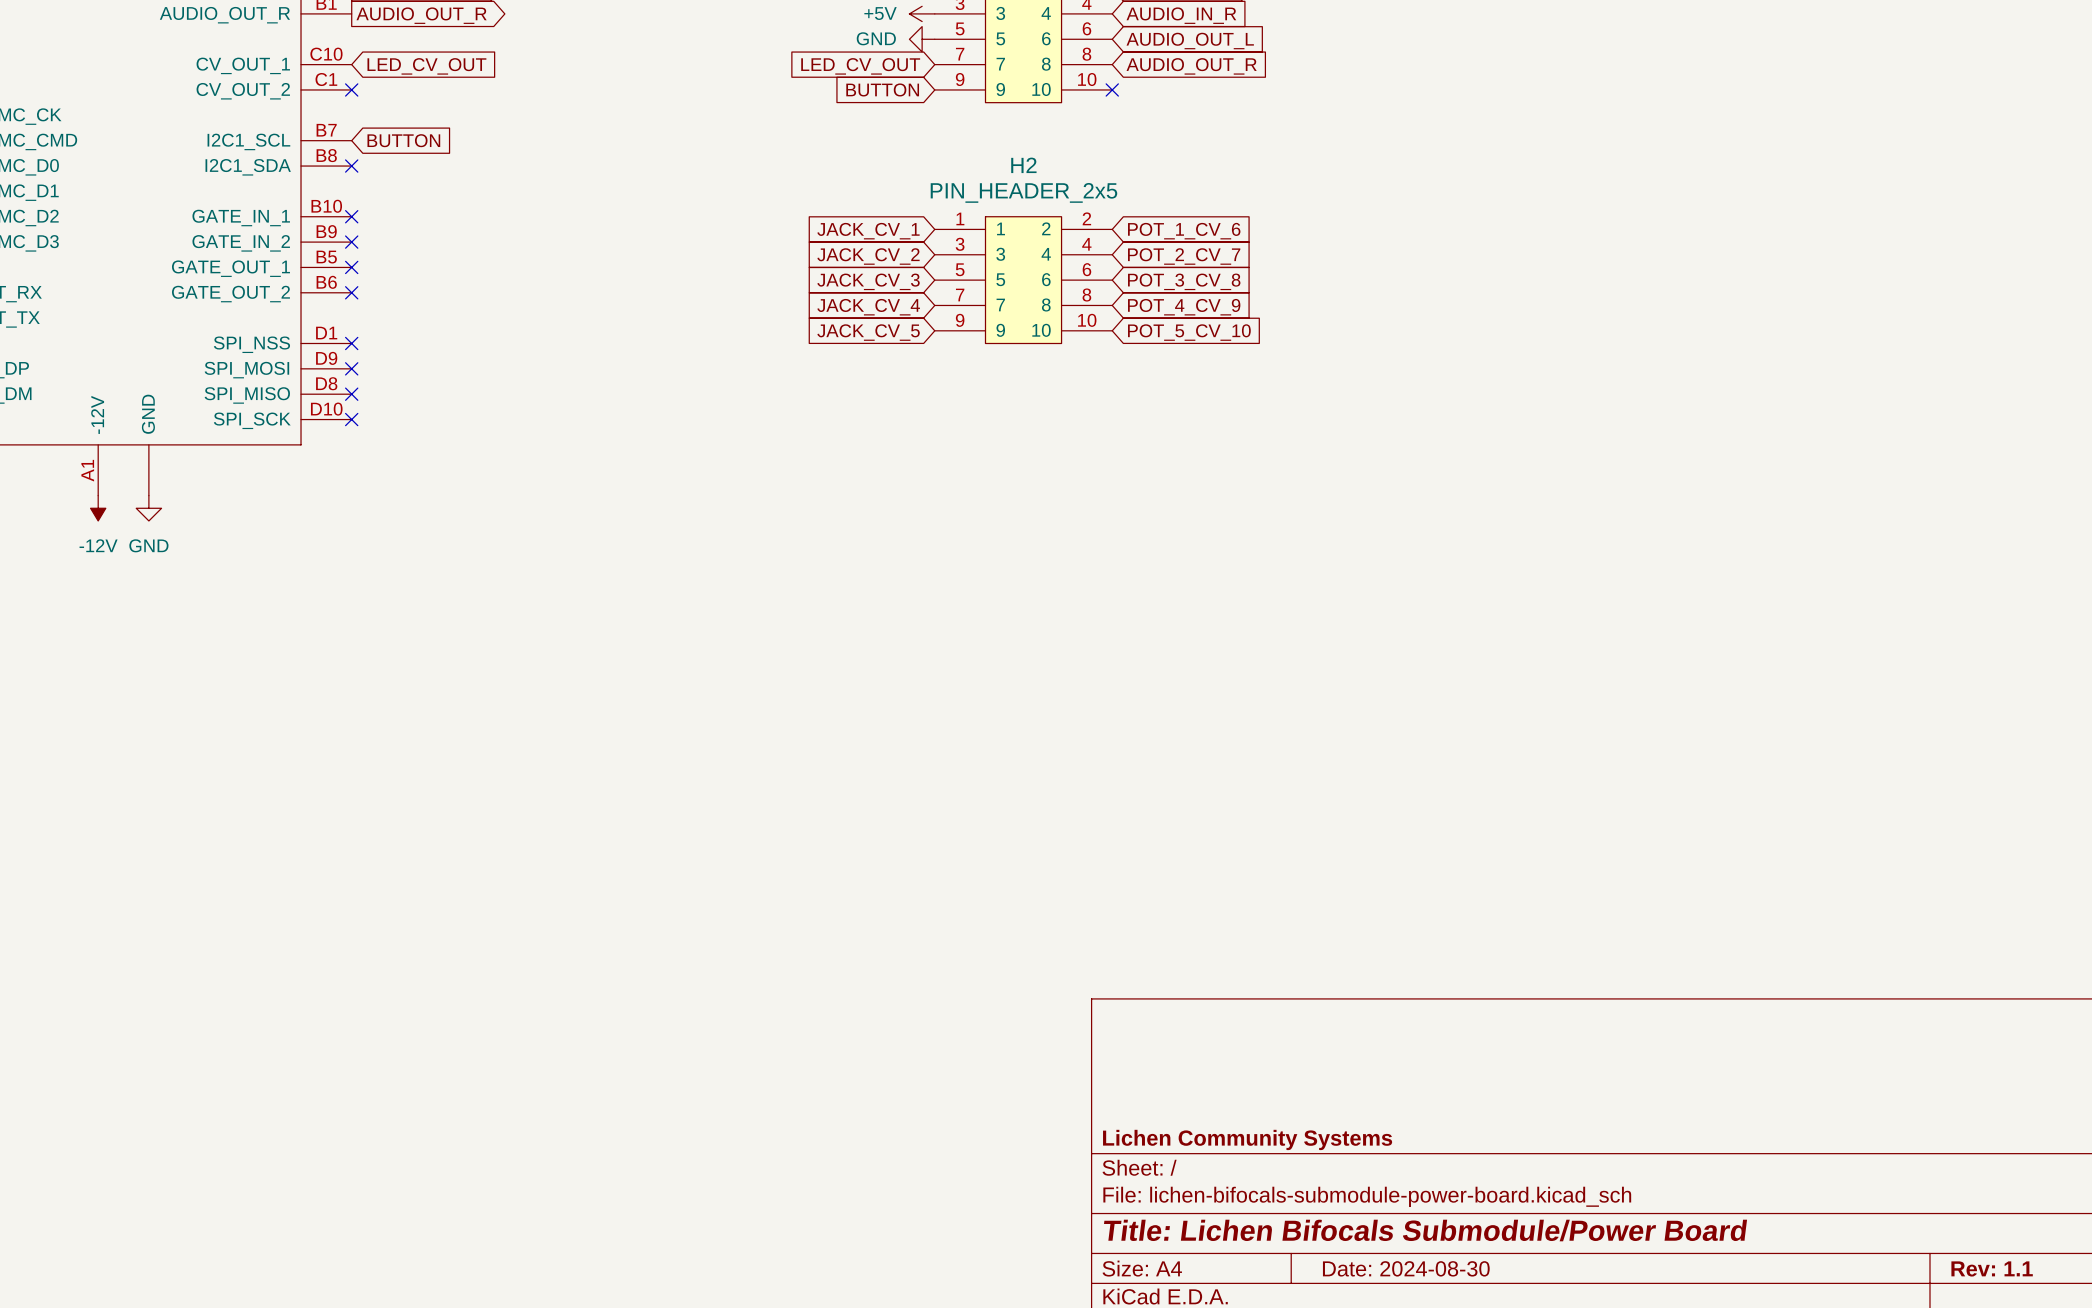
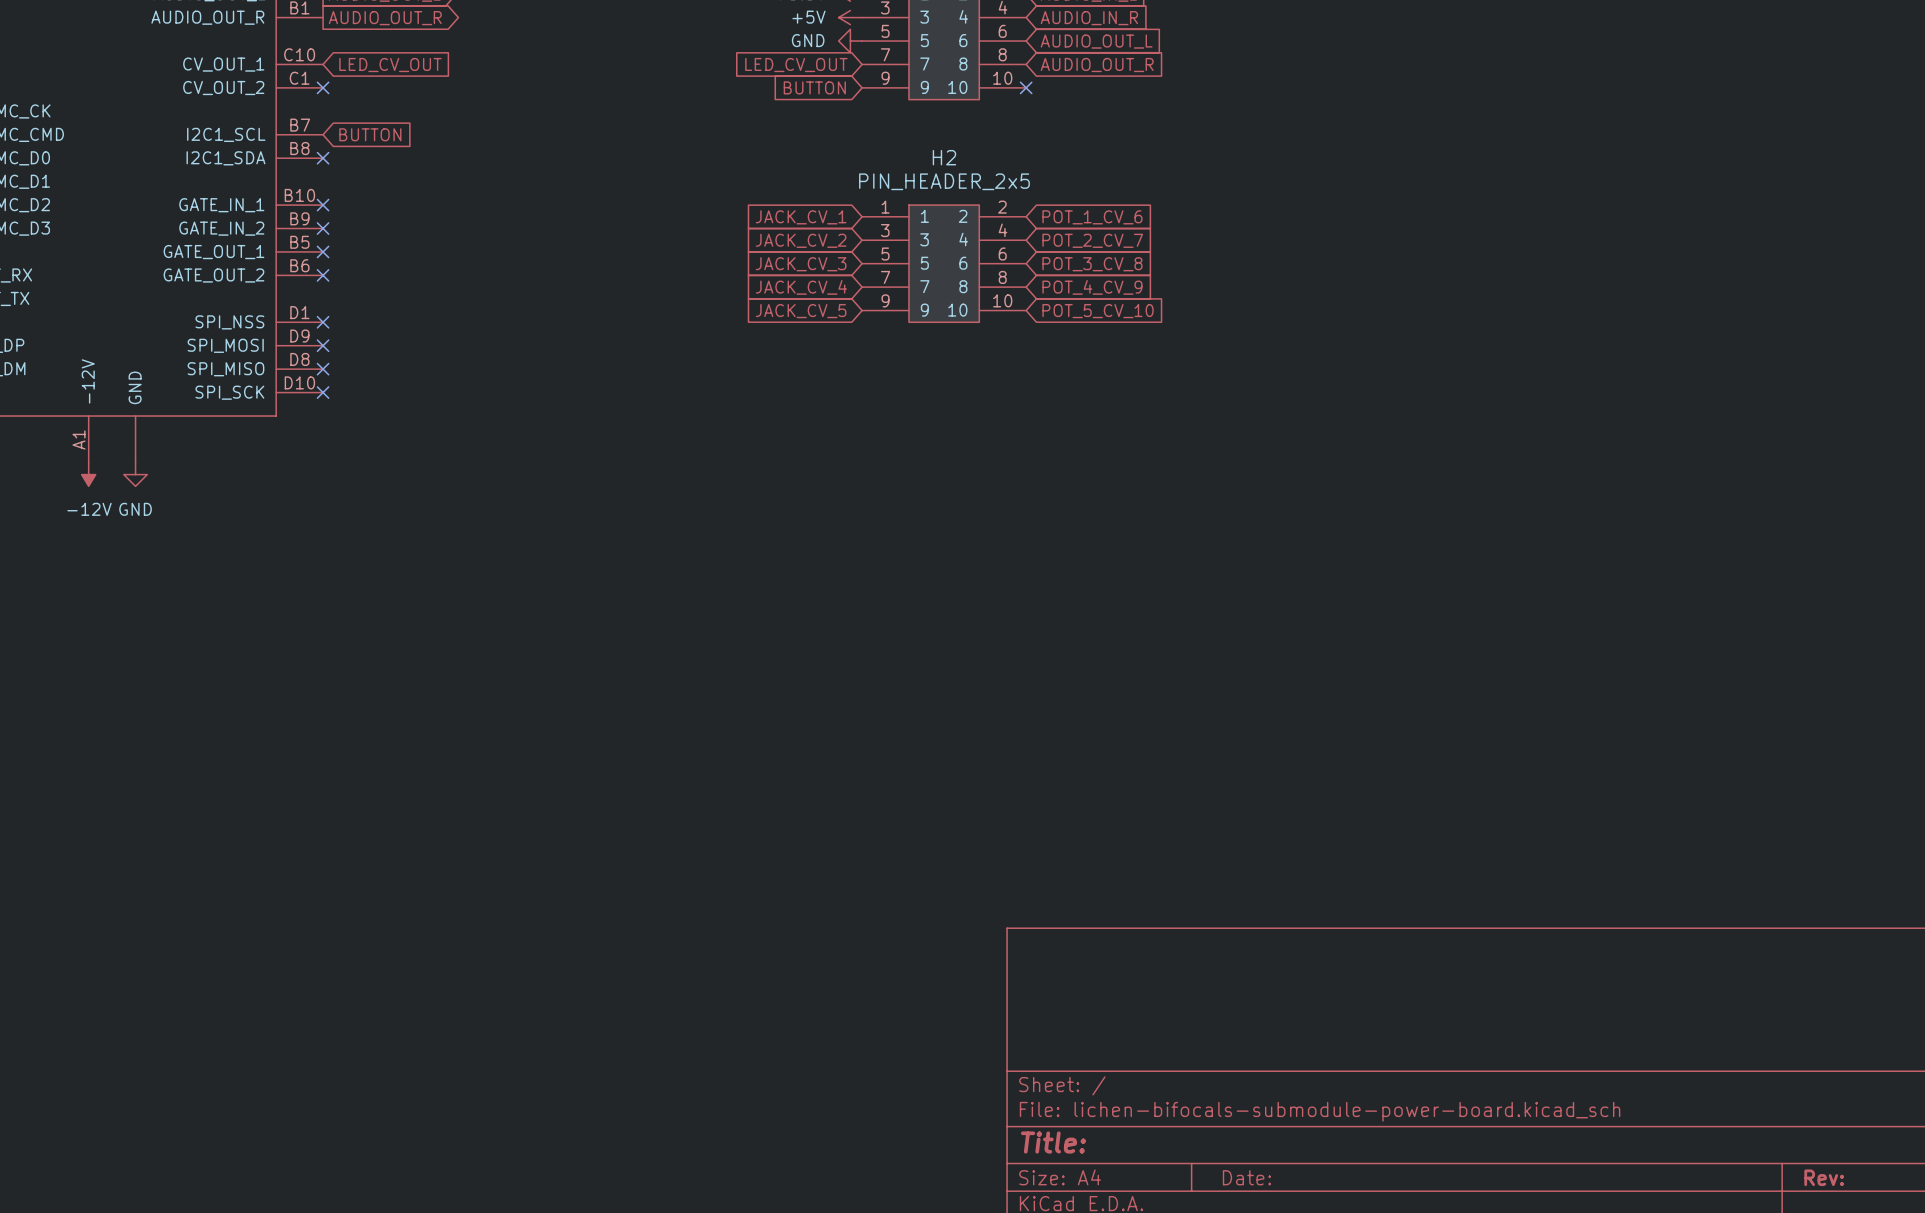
title block: Lichen Community Systems (1247, 1139) -> none
title block: Title: Lichen Bifocals Submodule/Power Board (1425, 1230) -> Title: (1053, 1142)
title block: Date: 2024-08-30 (1406, 1268) -> Date: (1246, 1177)
title block: Rev: 1.1 (1992, 1268) -> Rev: (1824, 1177)

